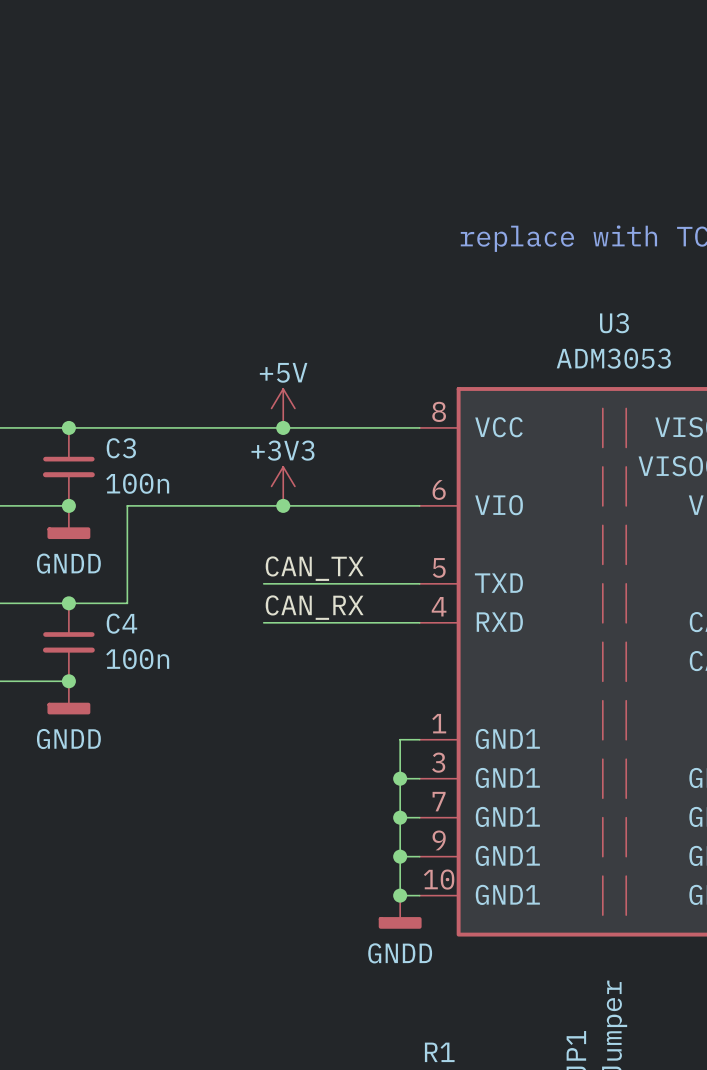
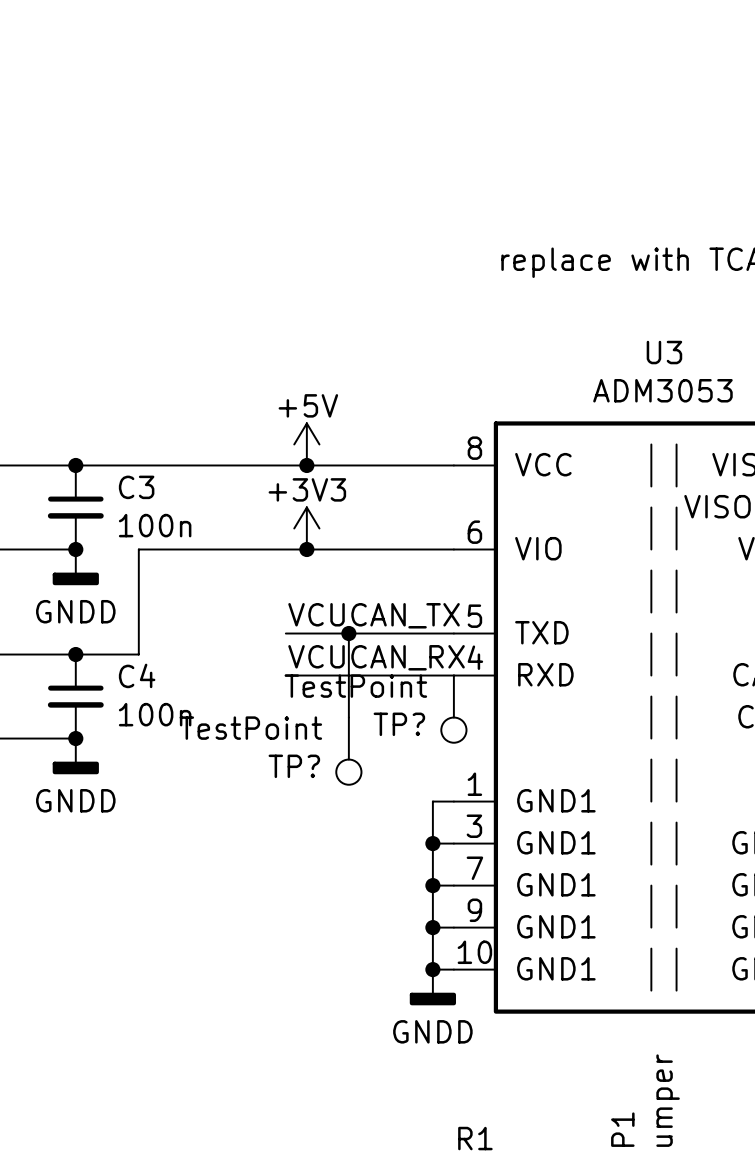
label: CAN_TX (314, 568) -> VCUCAN_TX (374, 615)
wire: none -> (348, 633) (348, 717)
junction: none -> (348, 633)
label: CAN_RX (314, 607) -> VCUCAN_RX (376, 657)
TP?: none -> TestPoint (453, 709)
TP?: none -> TestPoint (348, 751)

